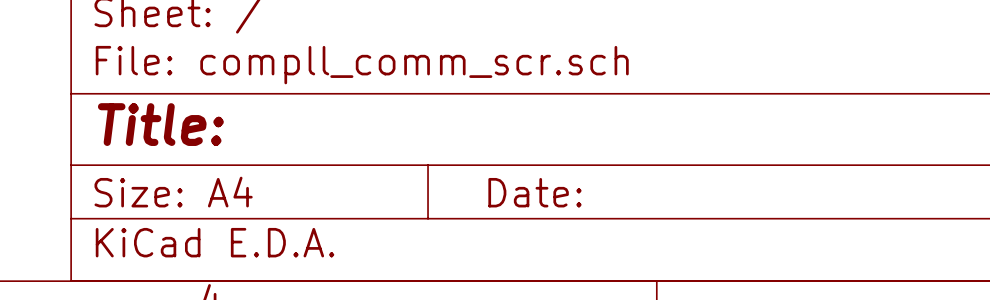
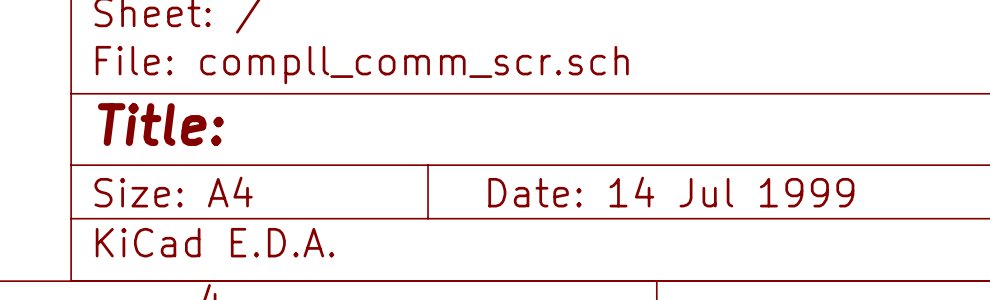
title block: Date: (534, 192) -> Date: 14 Jul 1999 (671, 192)

